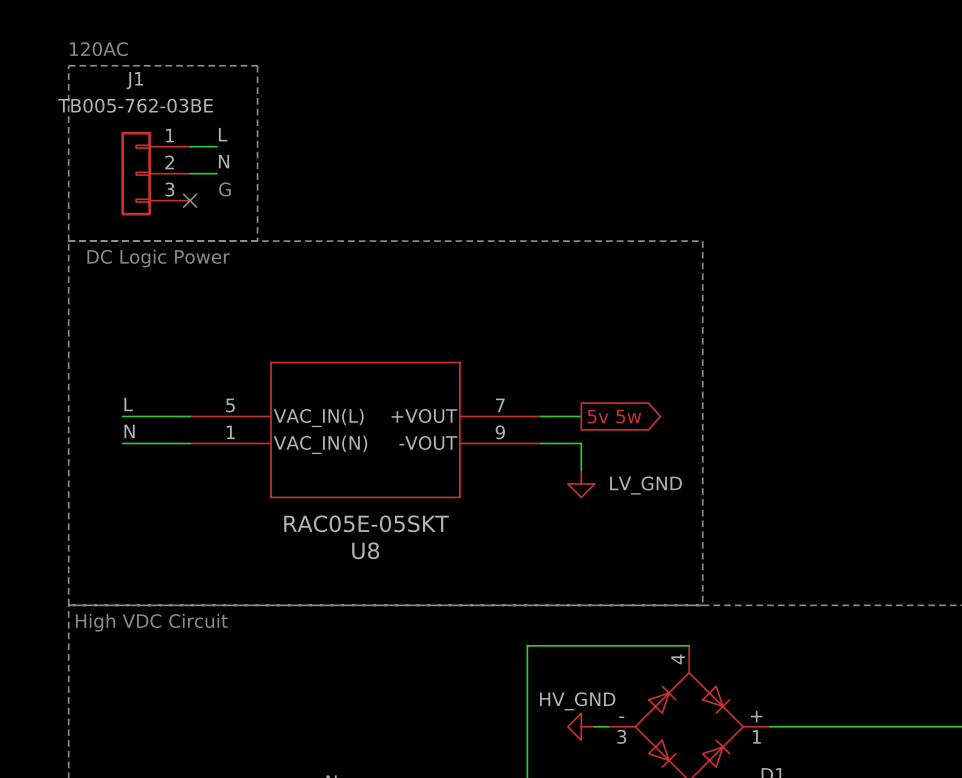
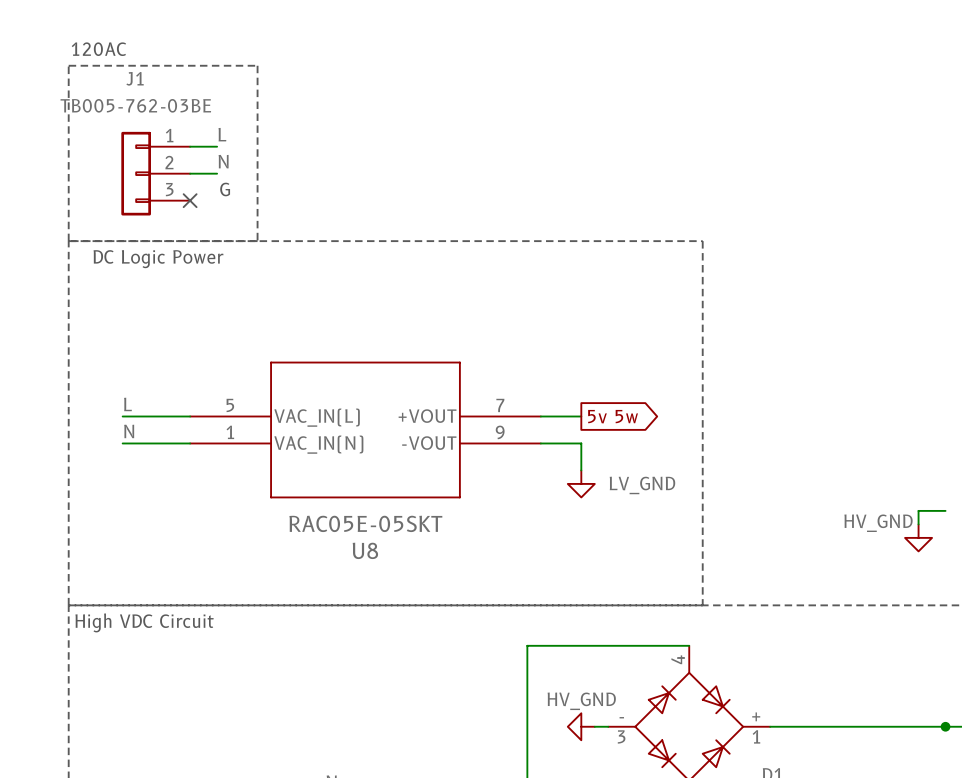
wire: none -> (945, 510) (918, 510) (918, 524)
power symbol: none -> HV_GND (918, 537)
junction: none -> (945, 726)

